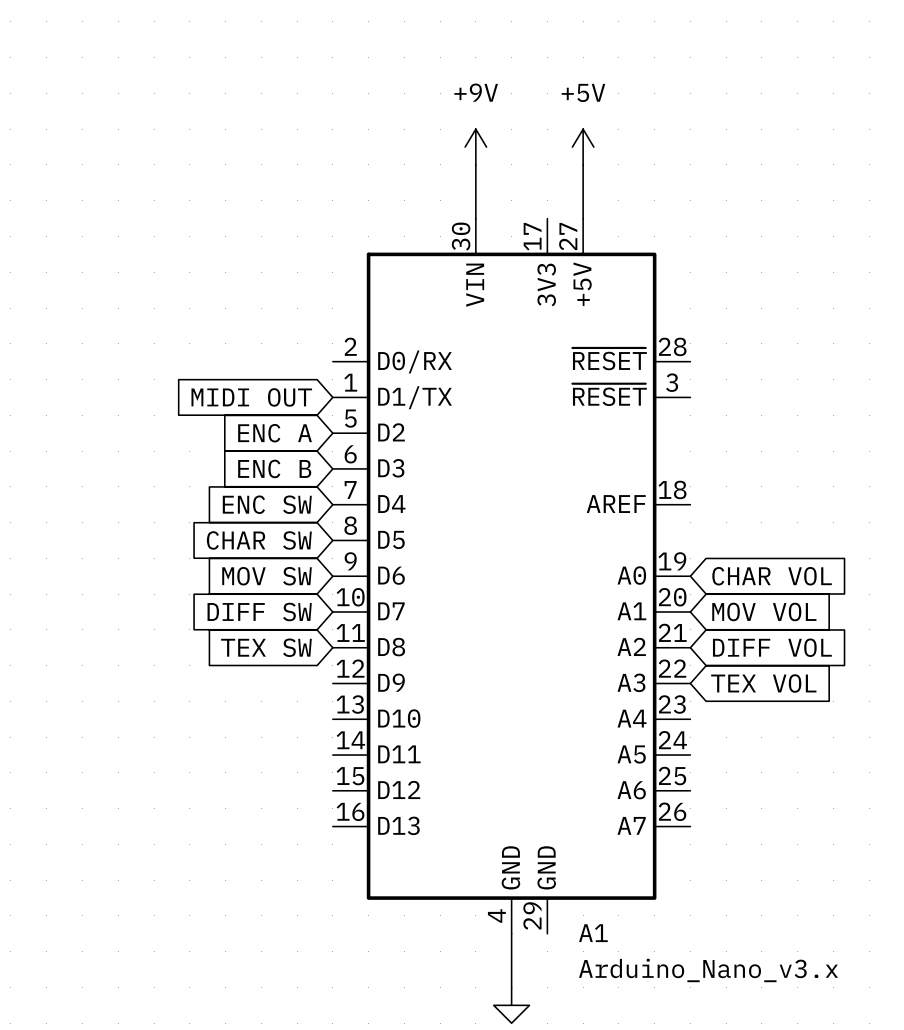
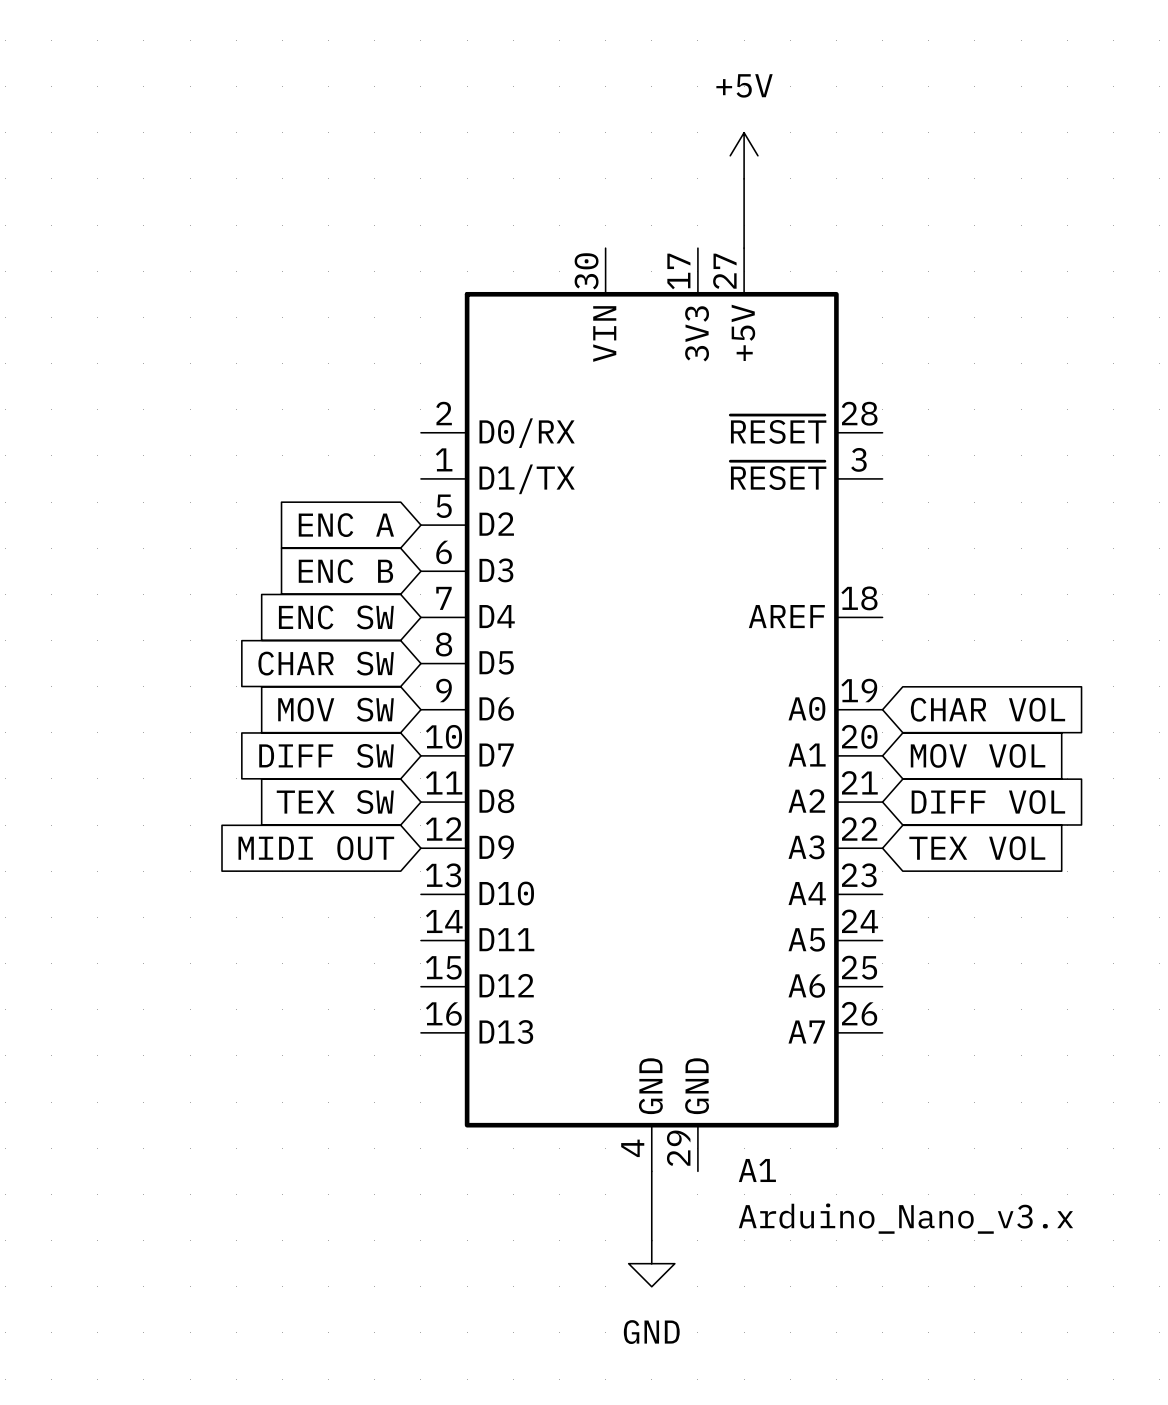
power symbol: +9V (475, 147) -> none
wire: (475, 164) (475, 218) -> none
global label position: MIDI OUT (251, 397) -> MIDI OUT (316, 848)

